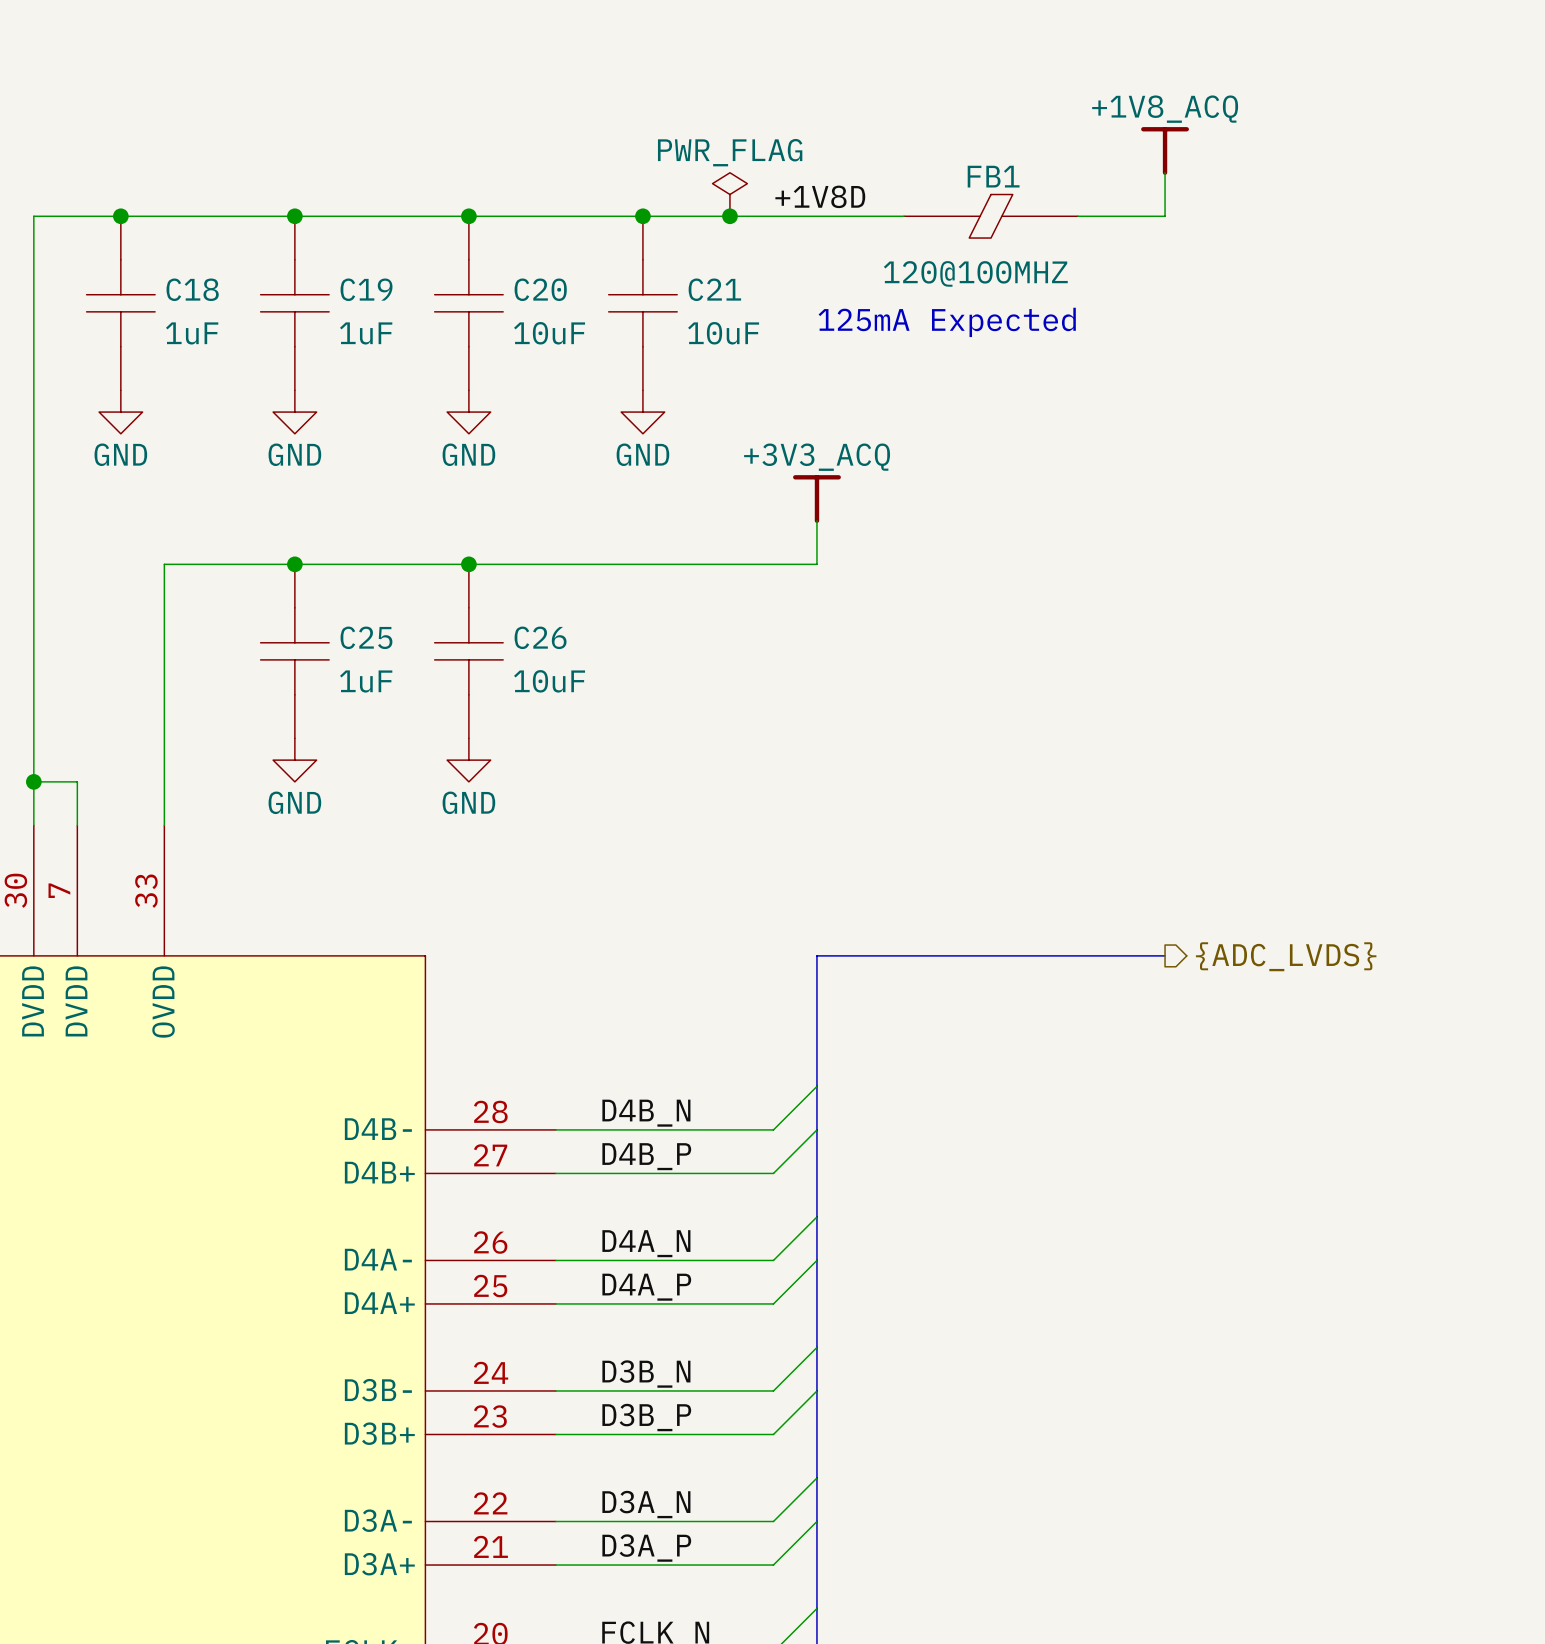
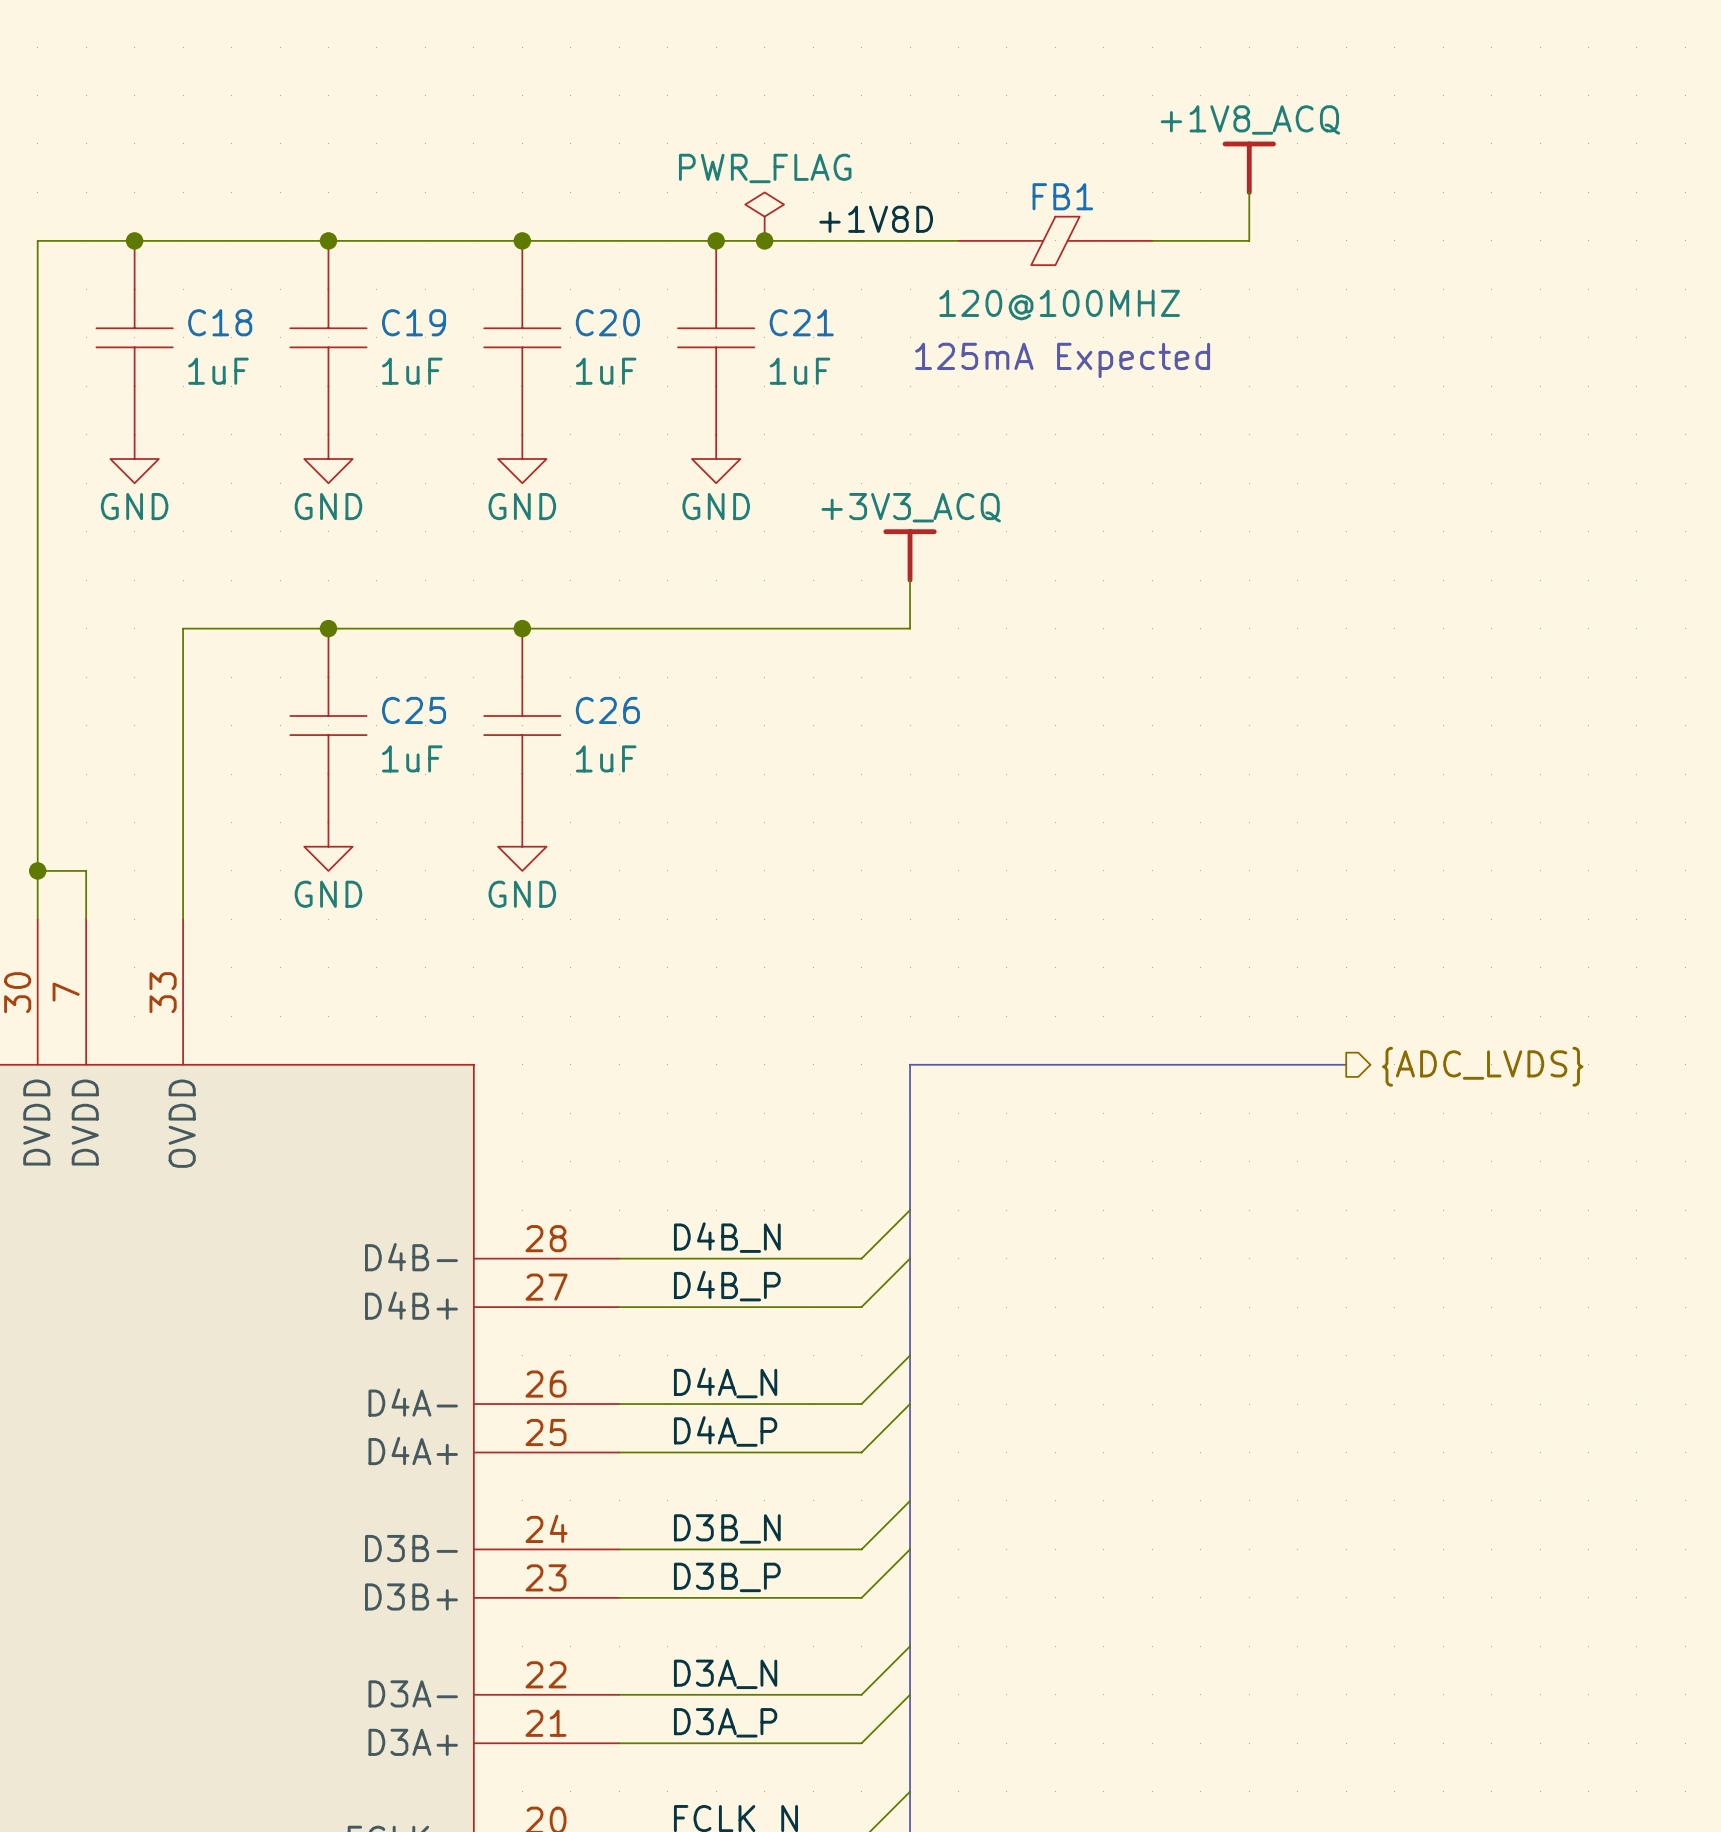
power symbol position: +1V8_ACQ (1165, 151) -> +1V8_ACQ (1249, 168)
wire: (1165, 172) (1165, 216) (1121, 216) -> (1249, 192) (1249, 240)
power symbol position: PWR_FLAG (729, 194) -> PWR_FLAG (764, 216)
label position: +1V8D (820, 196) -> +1V8D (876, 219)
junction position: (729, 216) -> (764, 240)
FB1 position: (991, 216) -> (1055, 240)
C20 value: 10uF (549, 333) -> 1uF (606, 371)
C21 value: 10uF (723, 333) -> 1uF (800, 371)
C26 value: 10uF (549, 681) -> 1uF (606, 758)
bus: none -> (1297, 1064) (1346, 1064)
hierarchical label position: {ADC_LVDS} (1286, 956) -> {ADC_LVDS} (1482, 1066)

